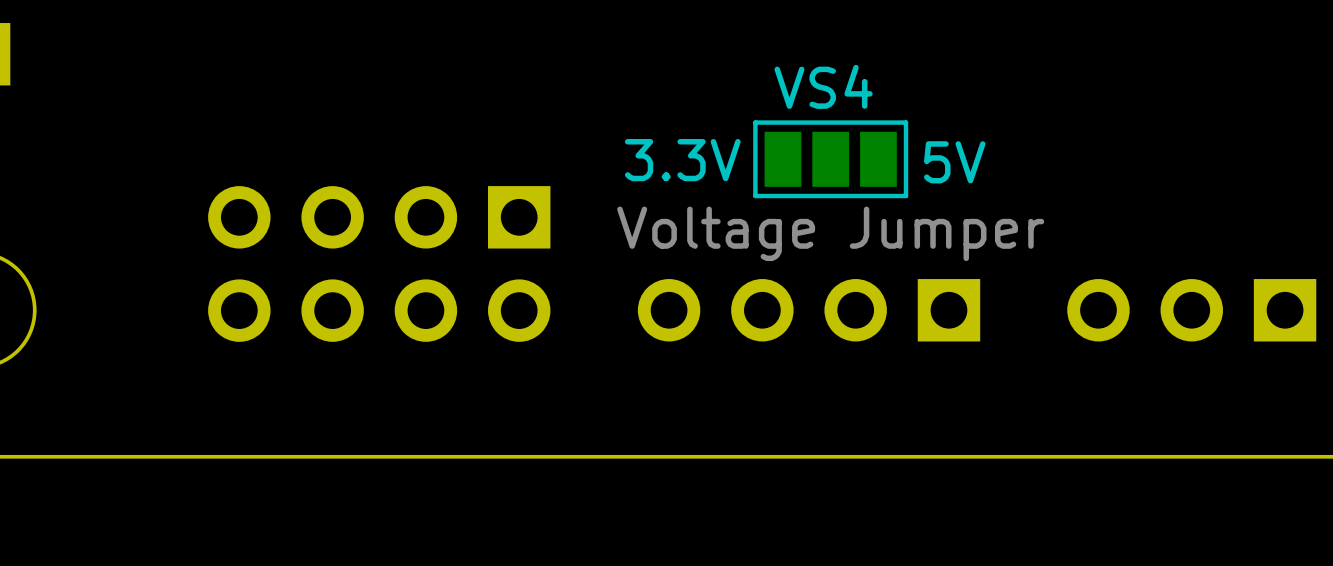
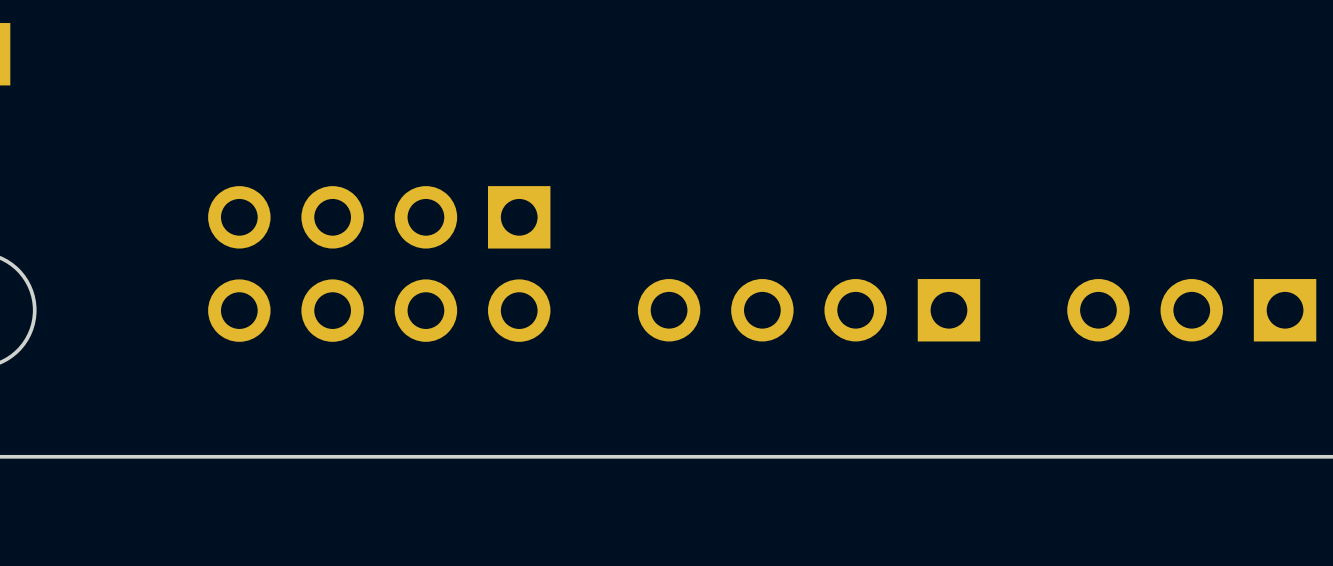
VS4: Voltage Jumper (830, 159) -> none

